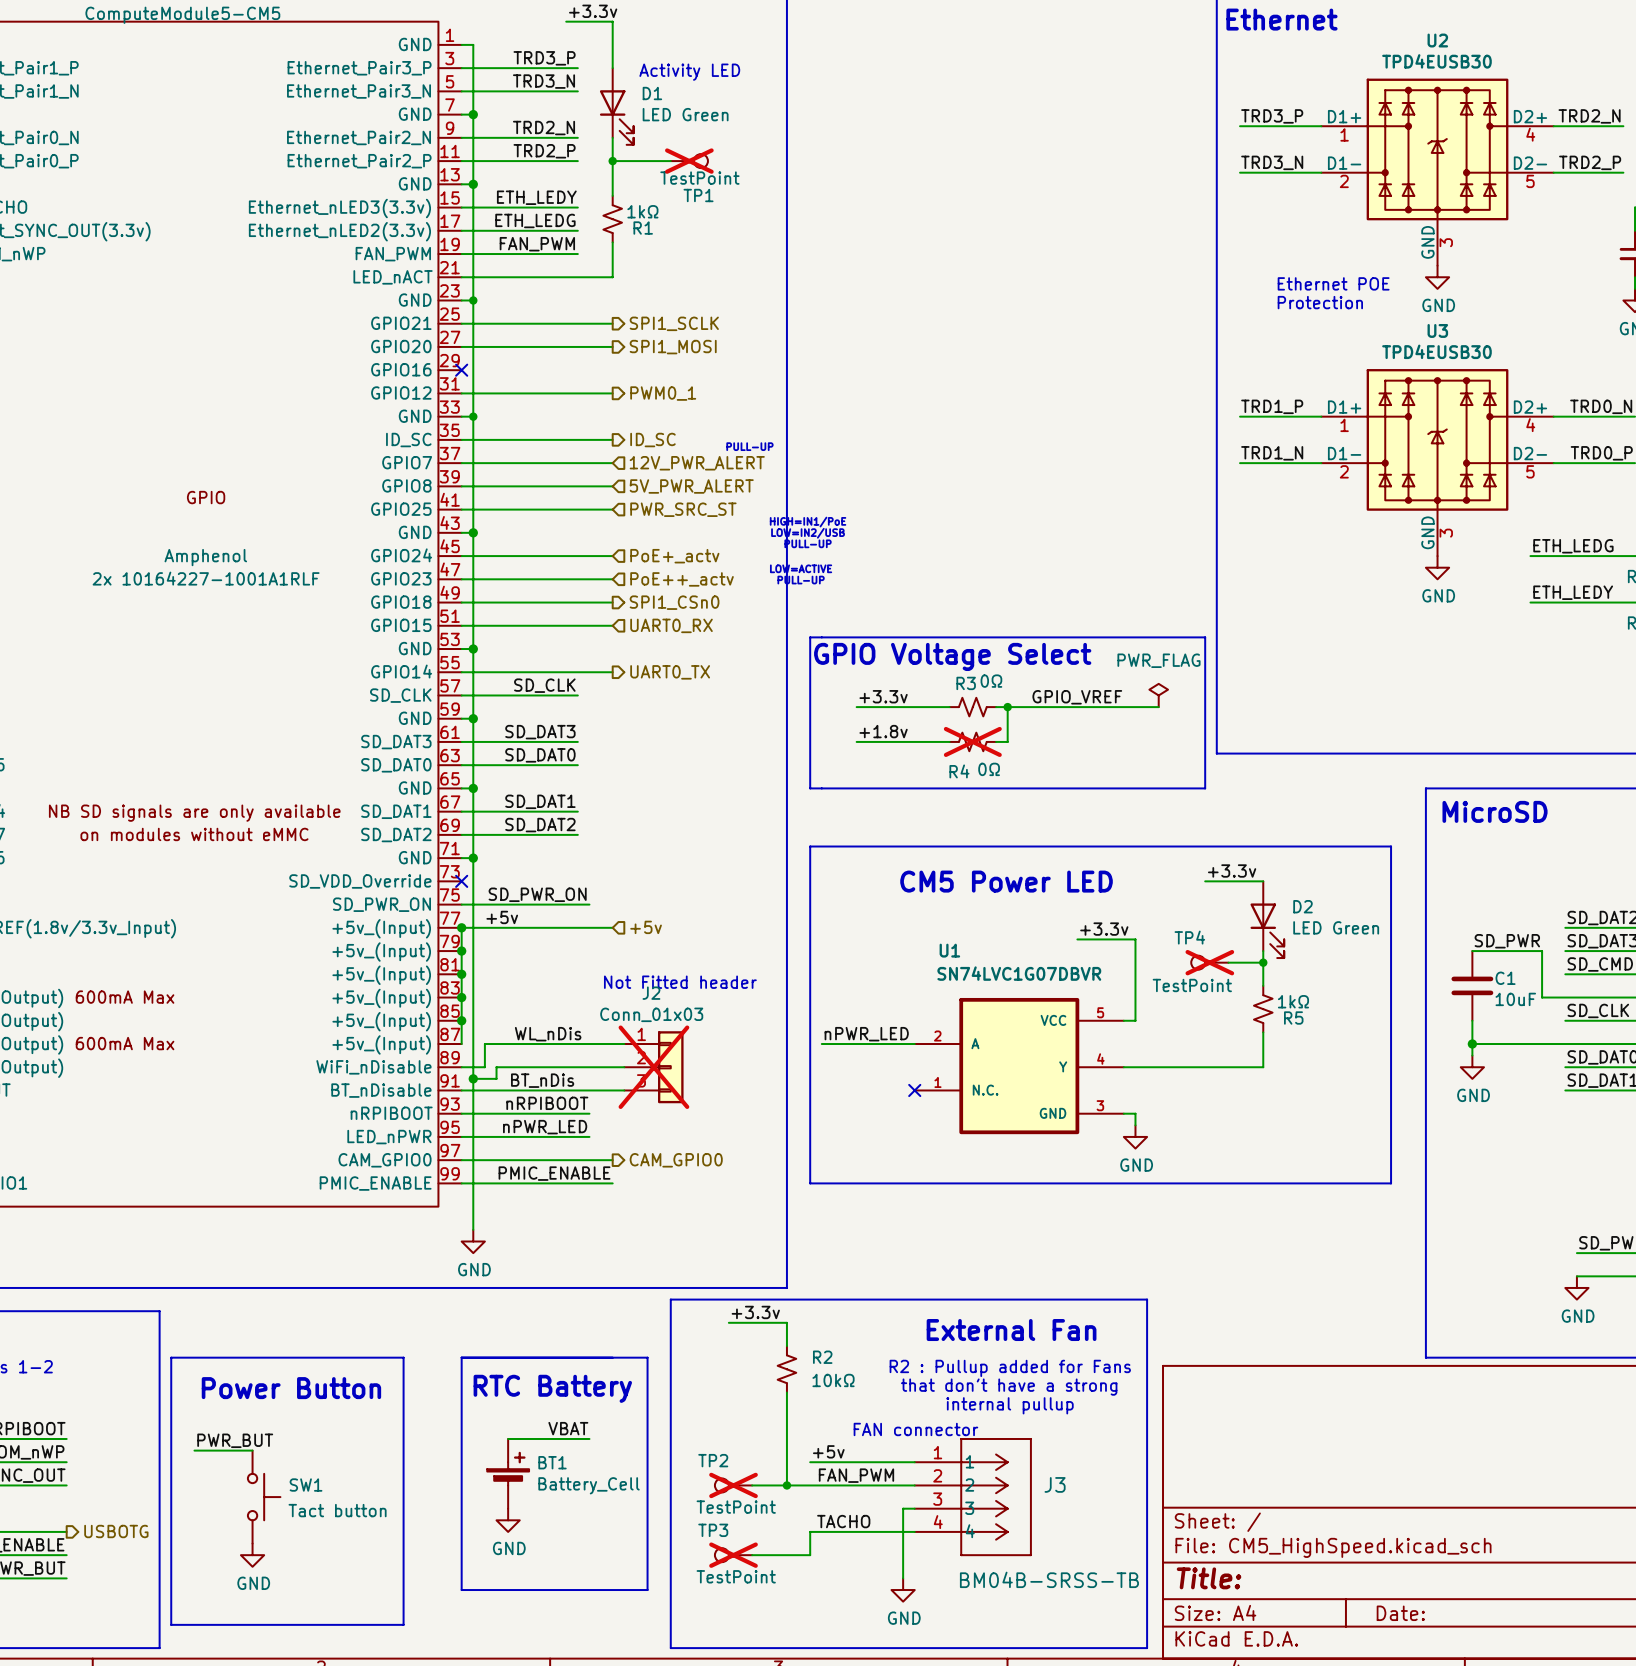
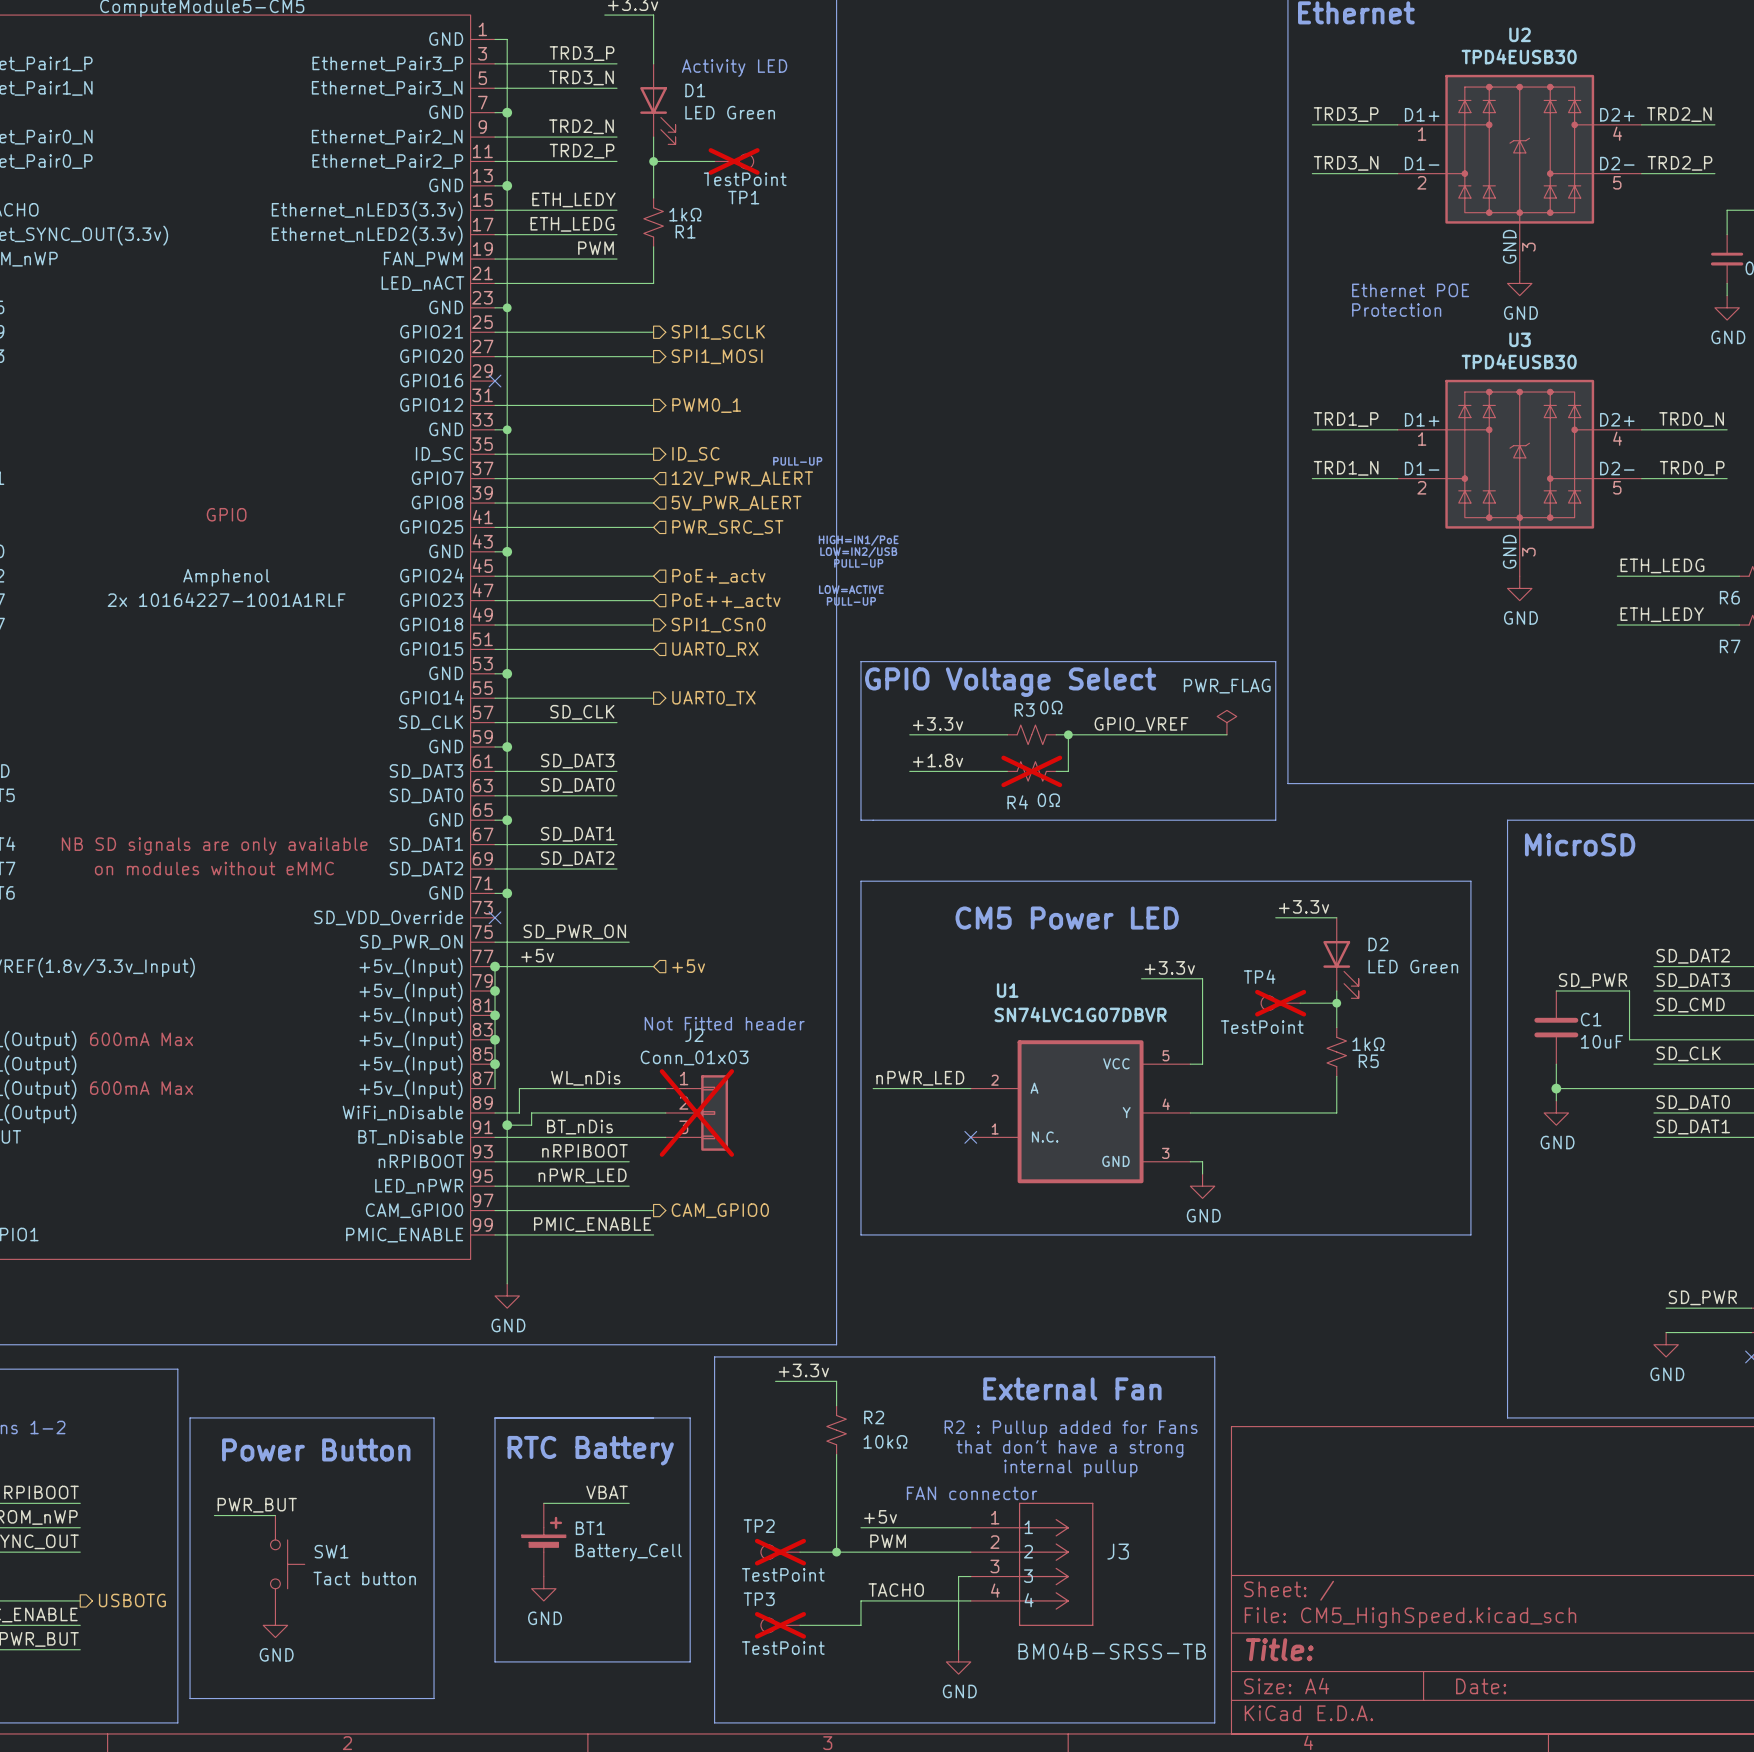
label: FAN_PWM (537, 244) -> PWM (596, 248)
label: FAN_PWM (856, 1475) -> PWM (888, 1541)

